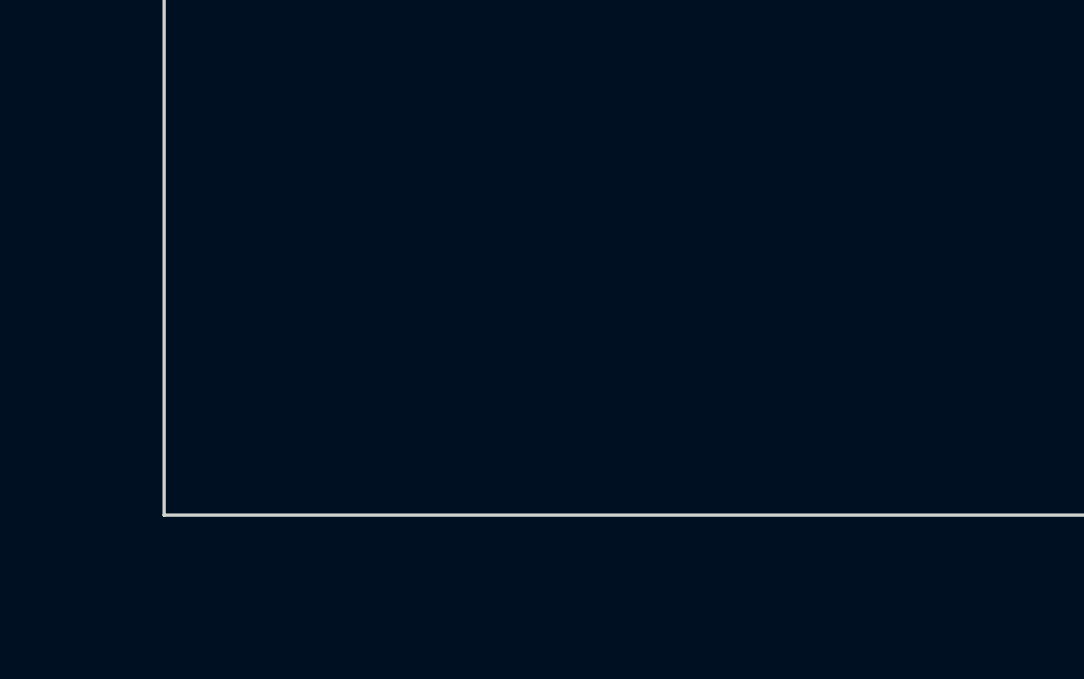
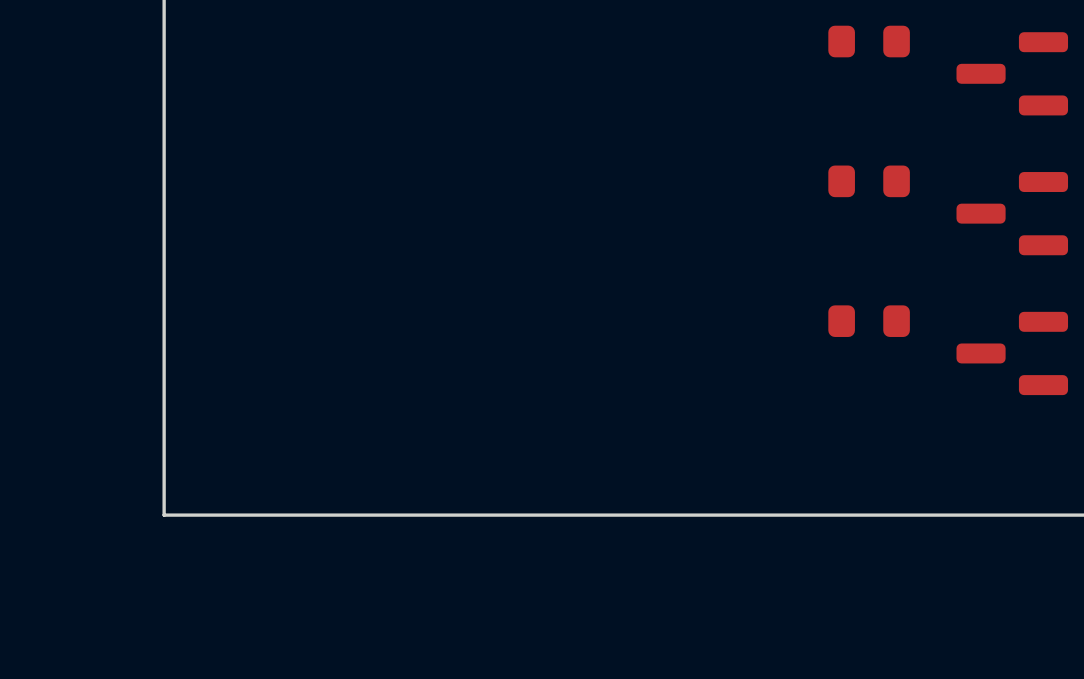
part: none -> (869, 41)
part: none -> (1012, 73)
part: none -> (869, 181)
part: none -> (1012, 213)
part: none -> (869, 321)
part: none -> (1012, 353)

